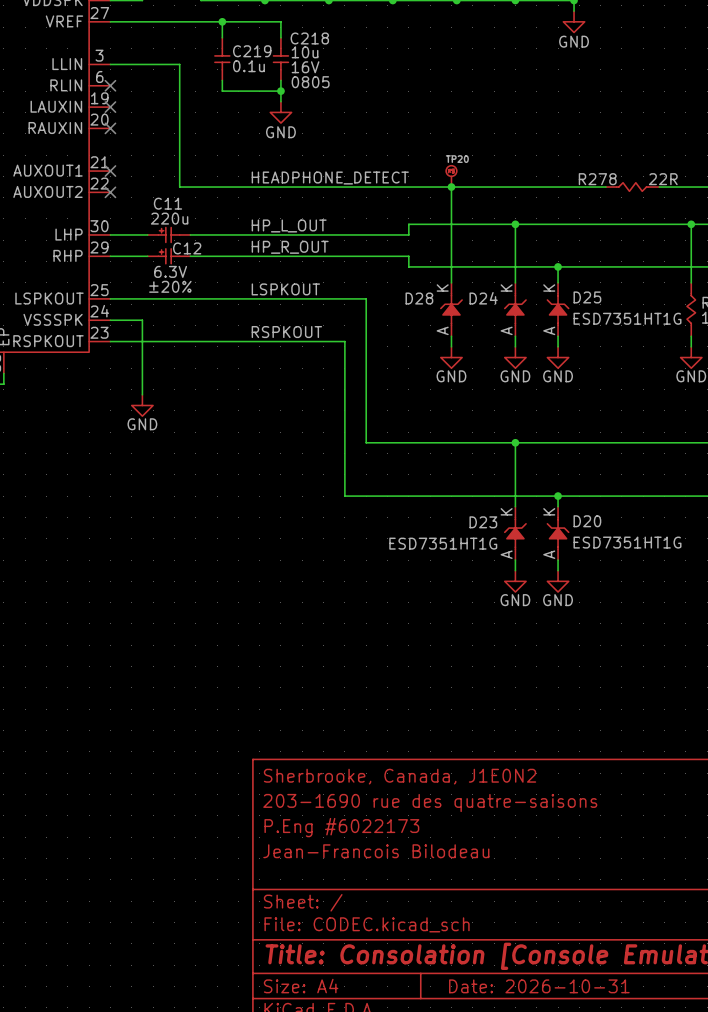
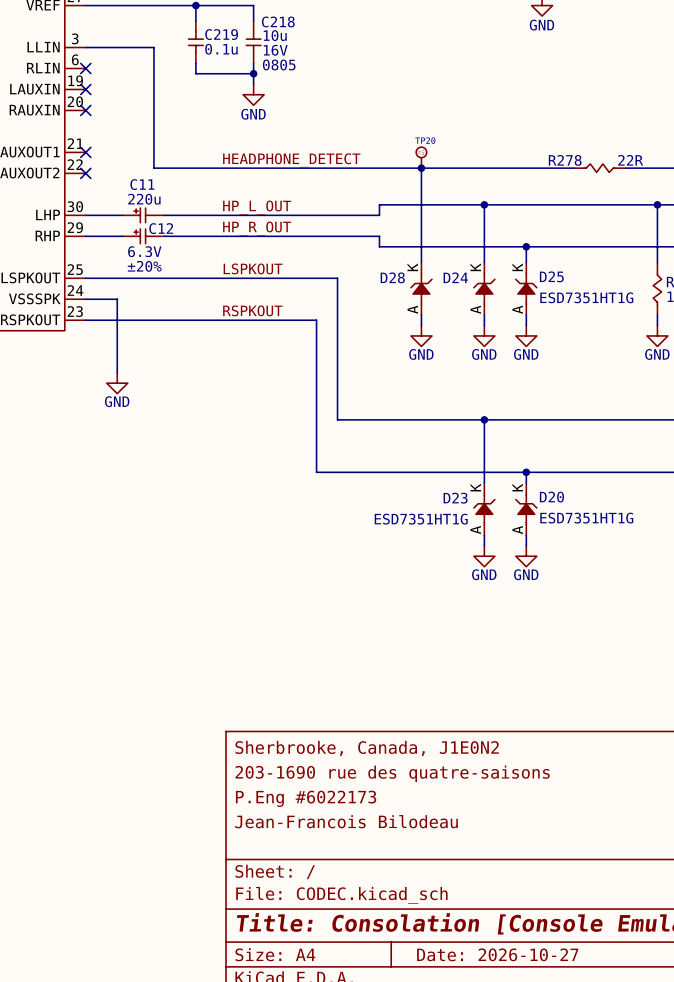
title block: Date: 2026-10-31 (539, 986) -> Date: 2026-10-27 (497, 954)

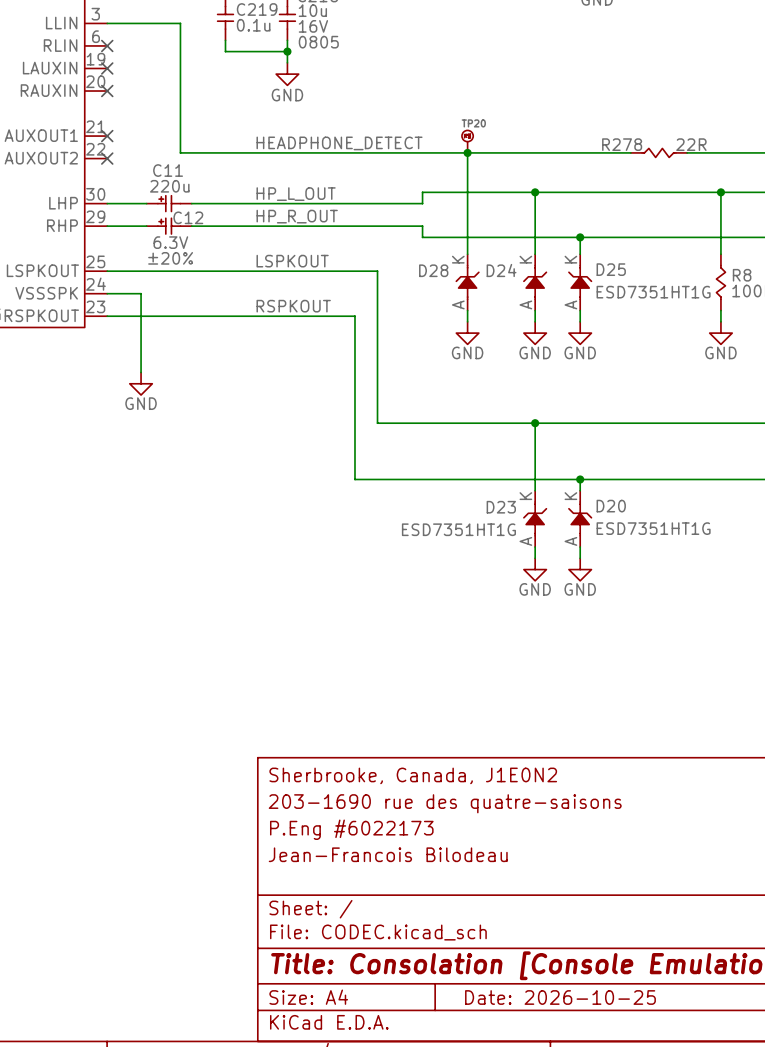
title block: Date: 2026-10-27 (497, 954) -> Date: 2026-10-25 (560, 997)

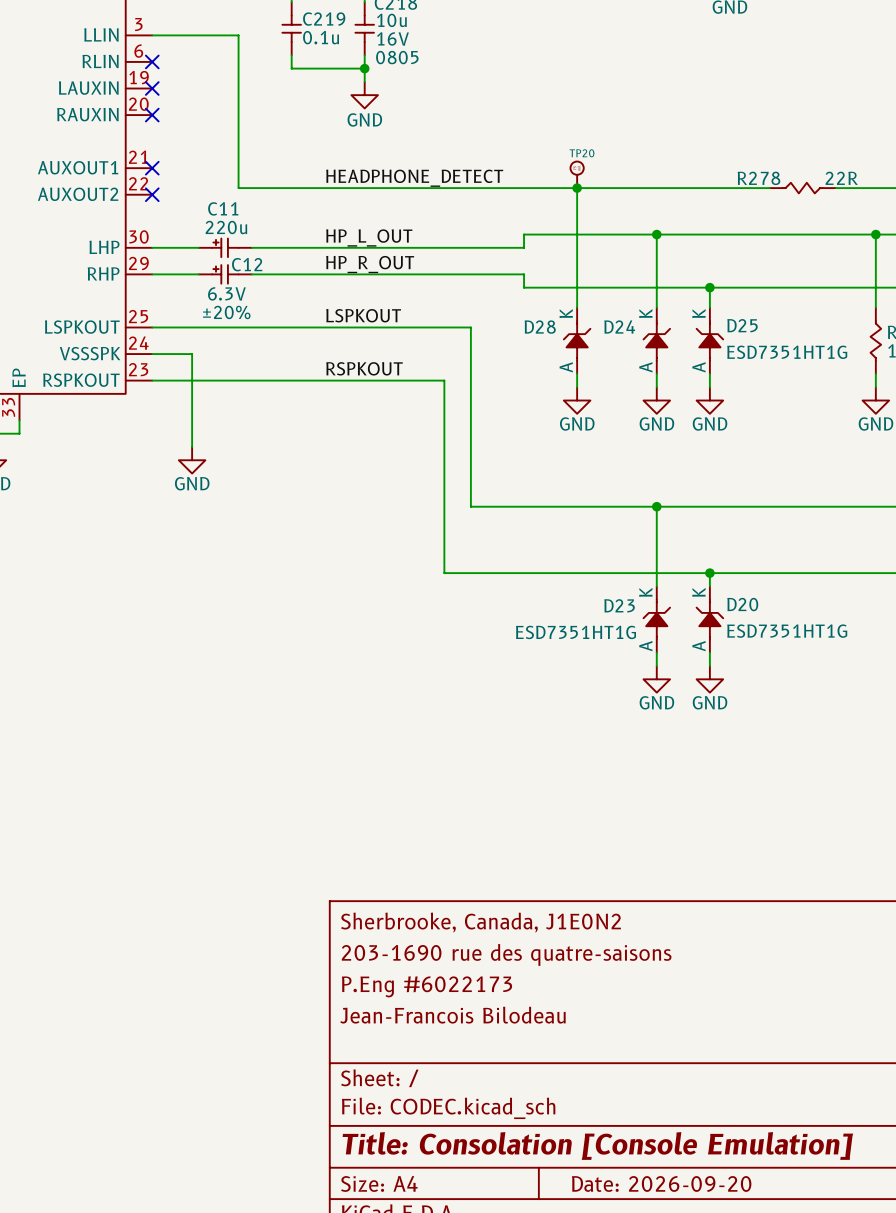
title block: Date: 2026-10-25 (560, 997) -> Date: 2026-09-20 (661, 1183)

